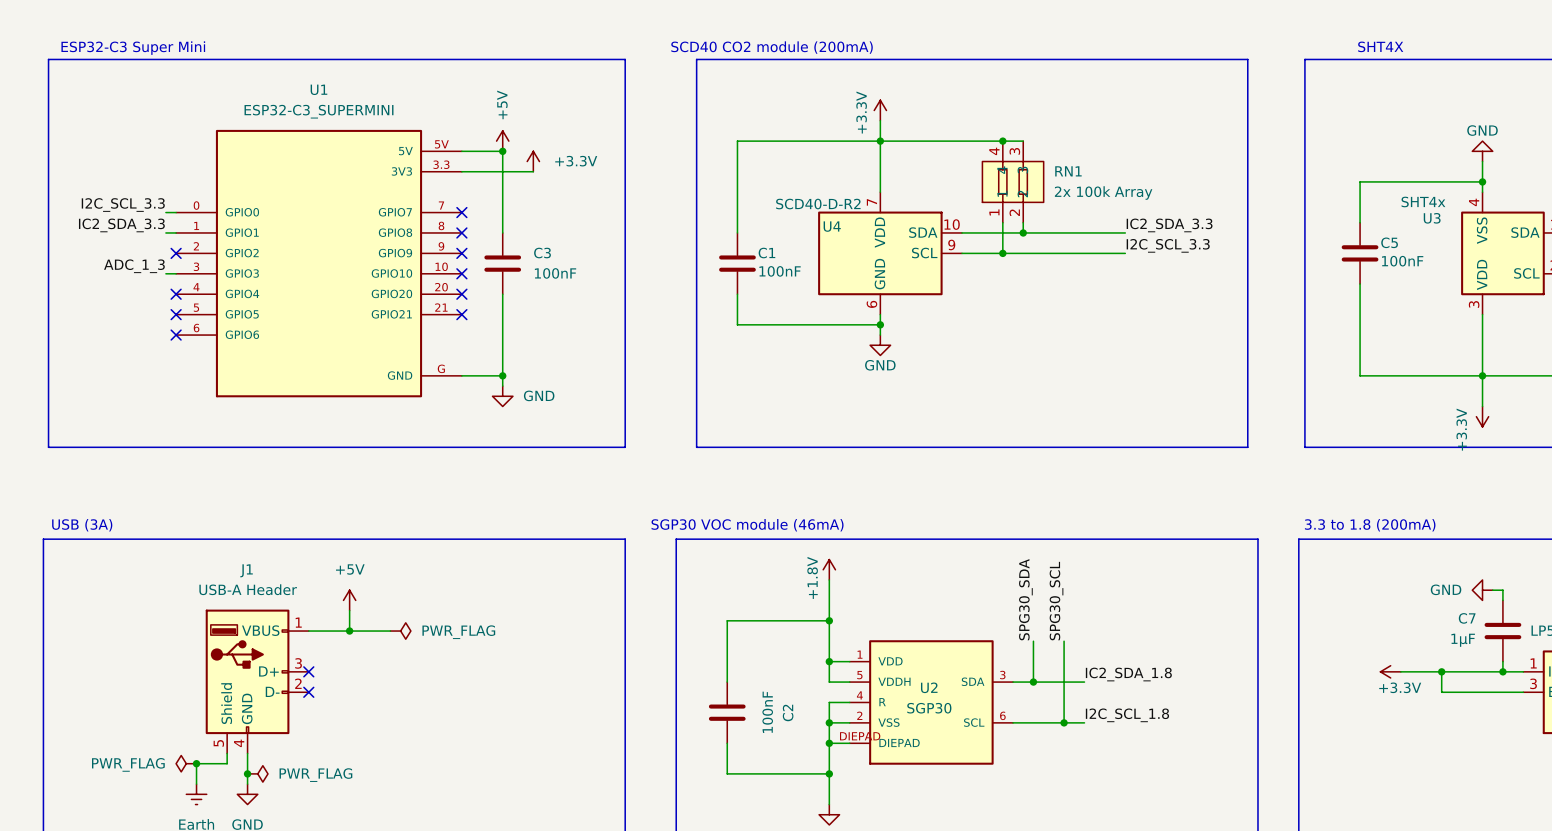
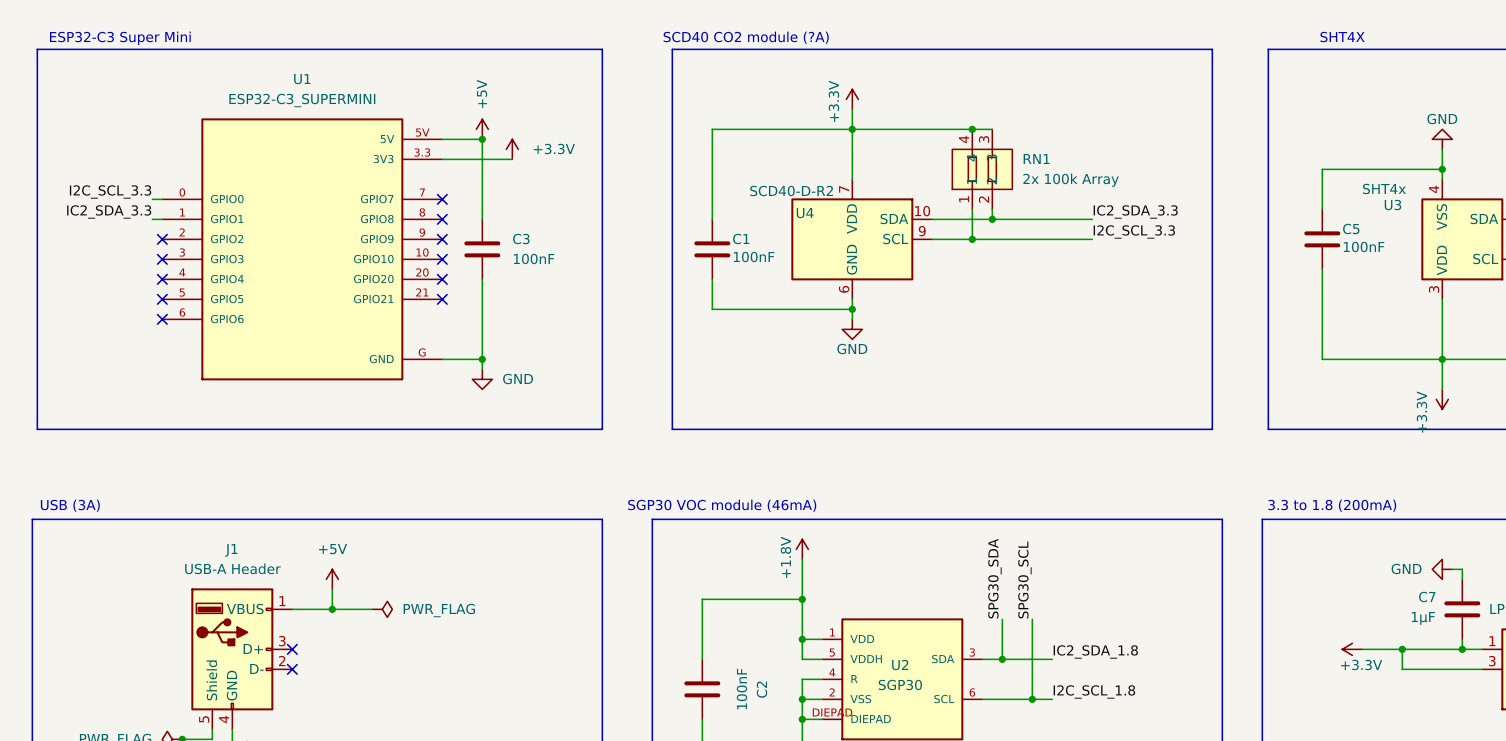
text: SCD40 CO2 module (200mA) (772, 47) -> SCD40 CO2 module (?A) (746, 37)
label: ADC_1_3 (134, 266) -> none
wire: (165, 273) (176, 273) -> none
no-connect mark: none -> (162, 259)

